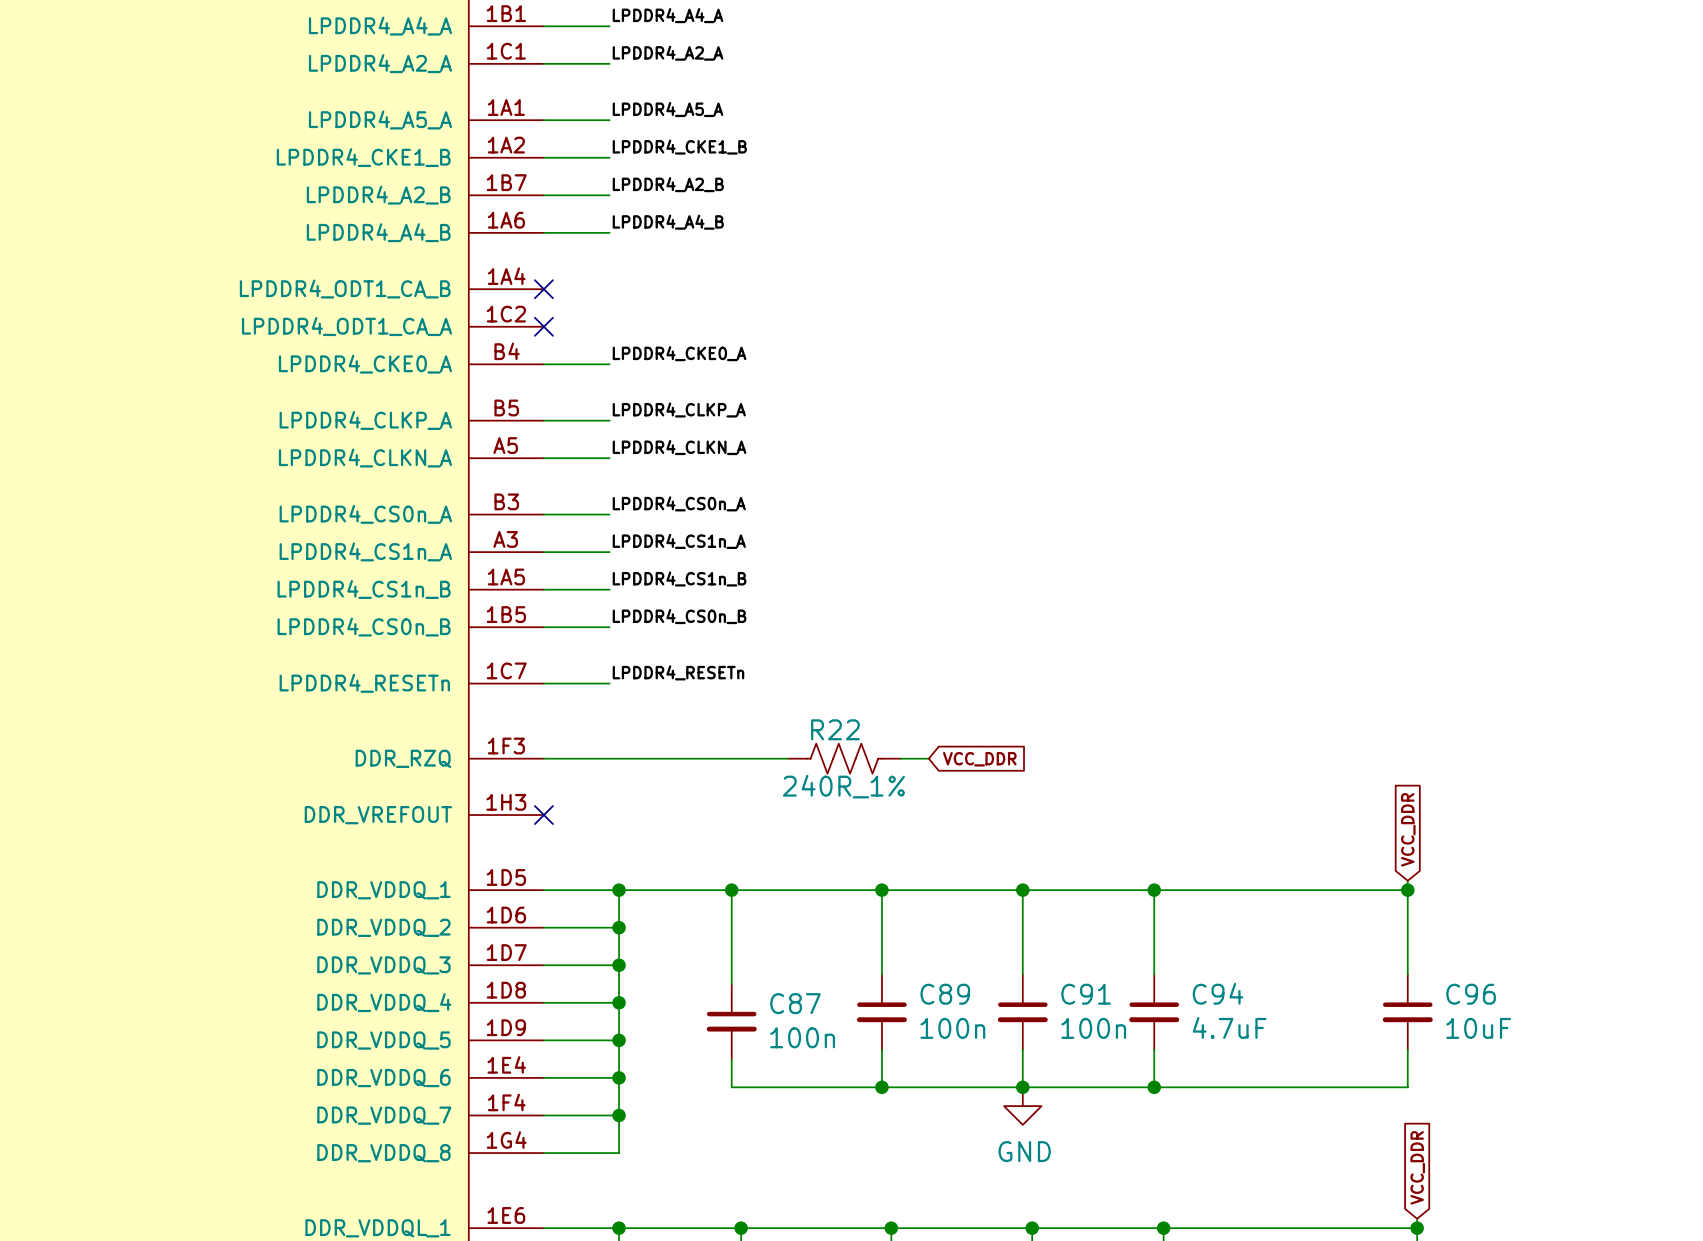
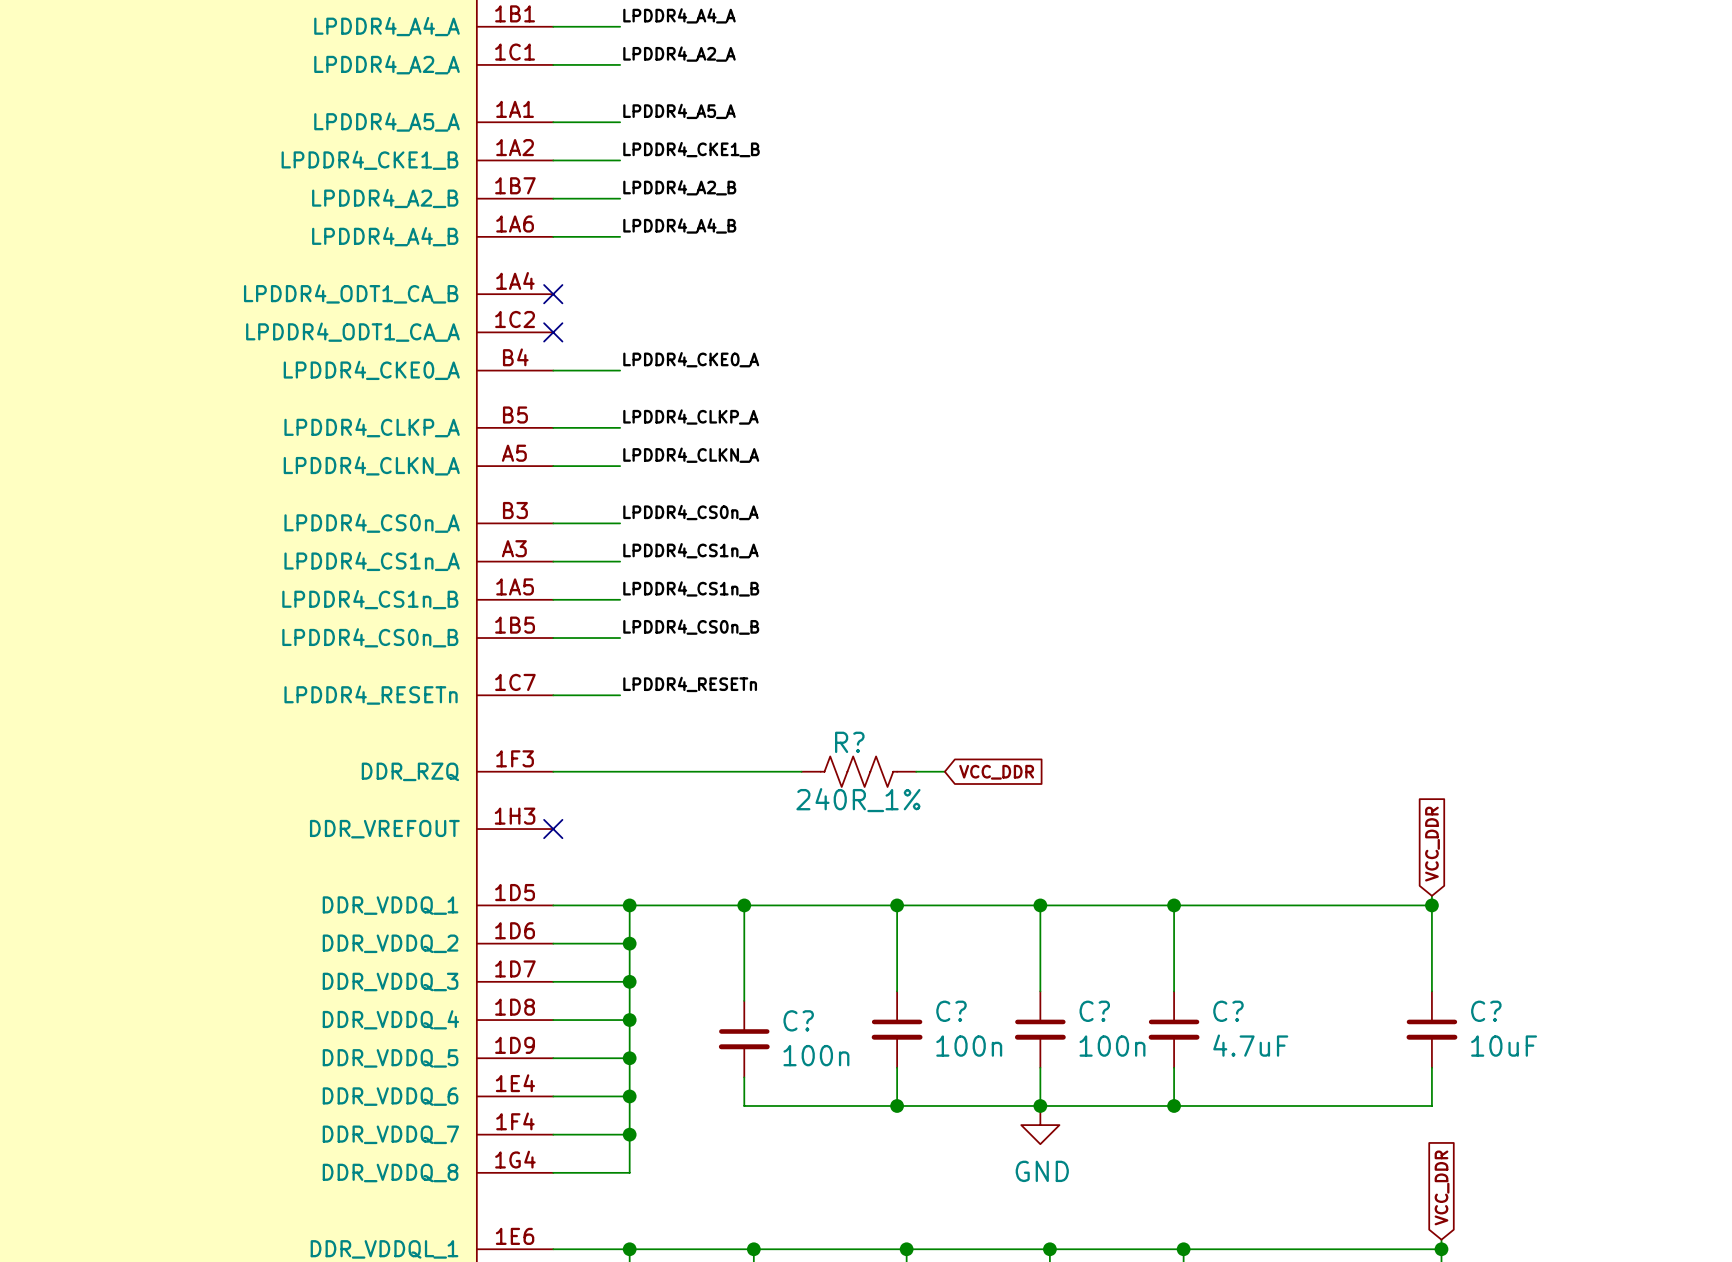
R22 name: R22 (835, 729) -> R? (849, 742)
C94 name: C94 (1218, 993) -> C? (1228, 1011)
C89 name: C89 (945, 994) -> C? (951, 1011)
C91 name: C91 (1086, 994) -> C? (1094, 1011)
C96 name: C96 (1471, 994) -> C? (1486, 1011)
C87 name: C87 (795, 1003) -> C? (798, 1020)

